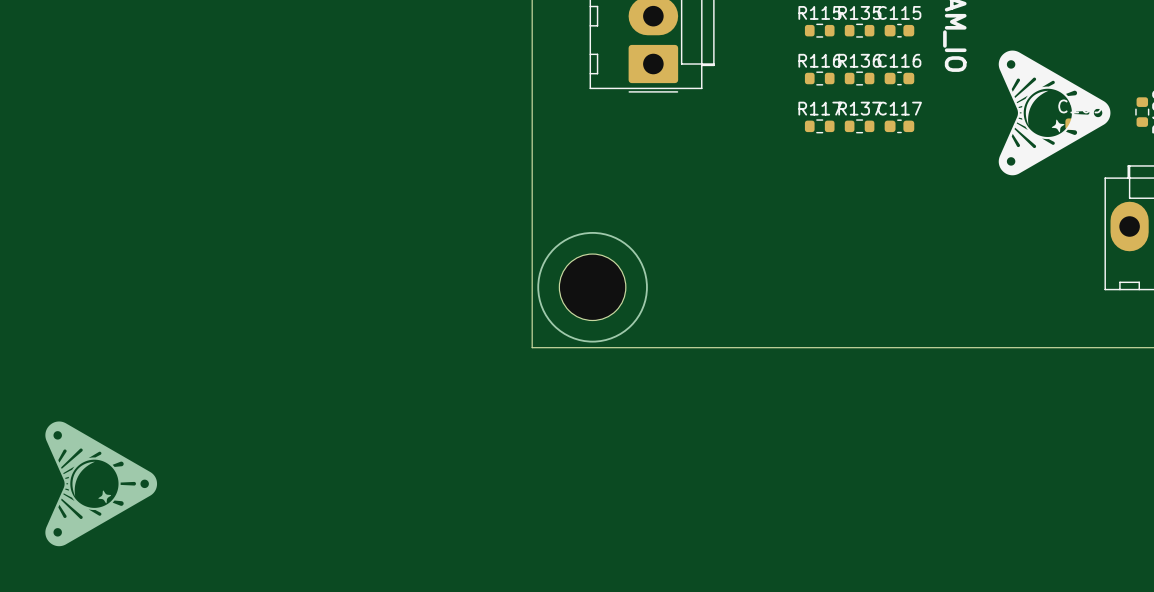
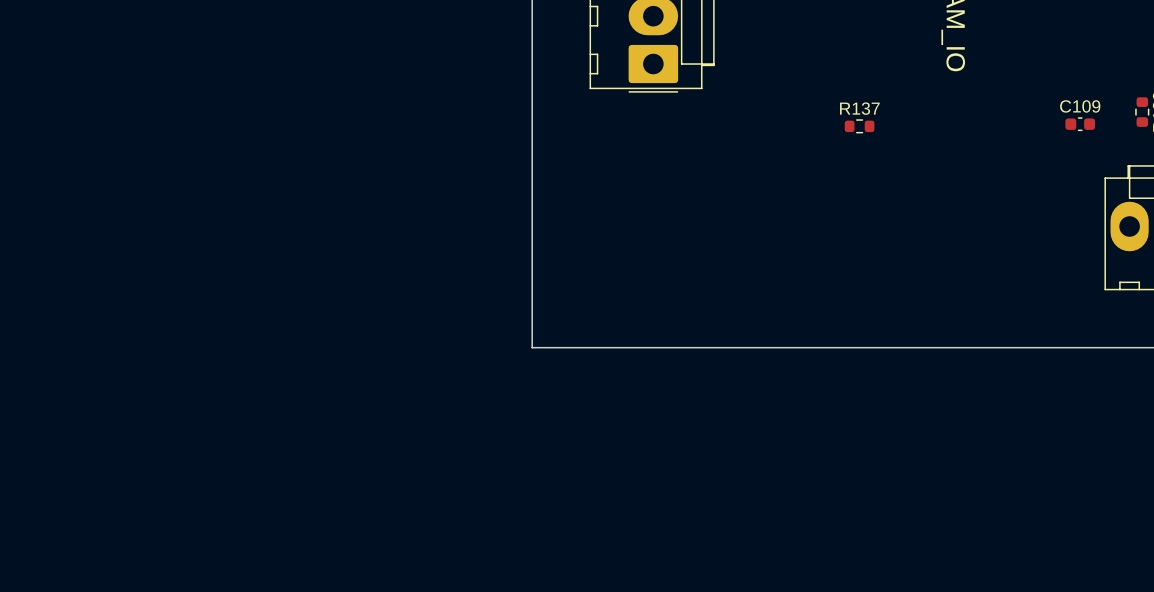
R115: (819, 30) -> none
R135: (859, 30) -> none
C115: (899, 30) -> none
drawing: [998, 50, 1111, 176] -> none
R116: (819, 78) -> none
R136: (859, 78) -> none
C116: (899, 78) -> none
R117: (819, 126) -> none
C117: (899, 126) -> none
part: (592, 287) -> none
drawing: [45, 421, 158, 547] -> none

